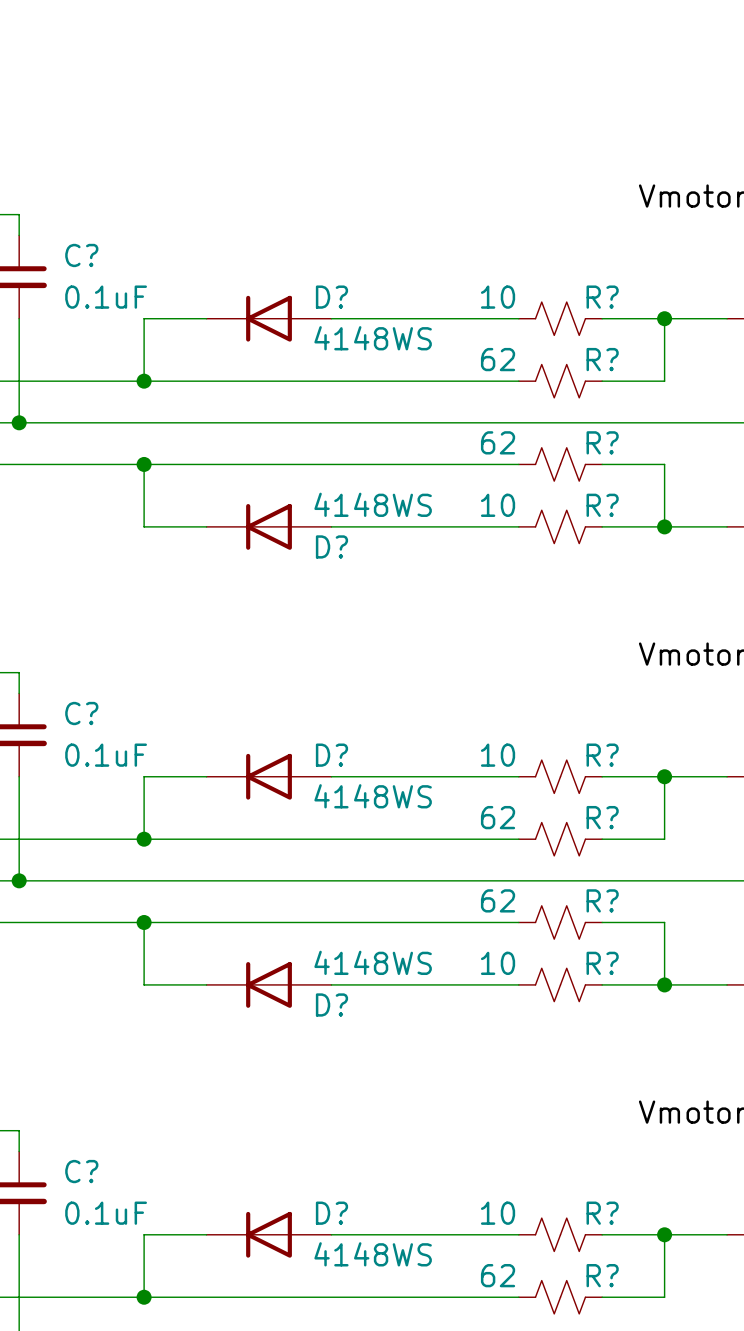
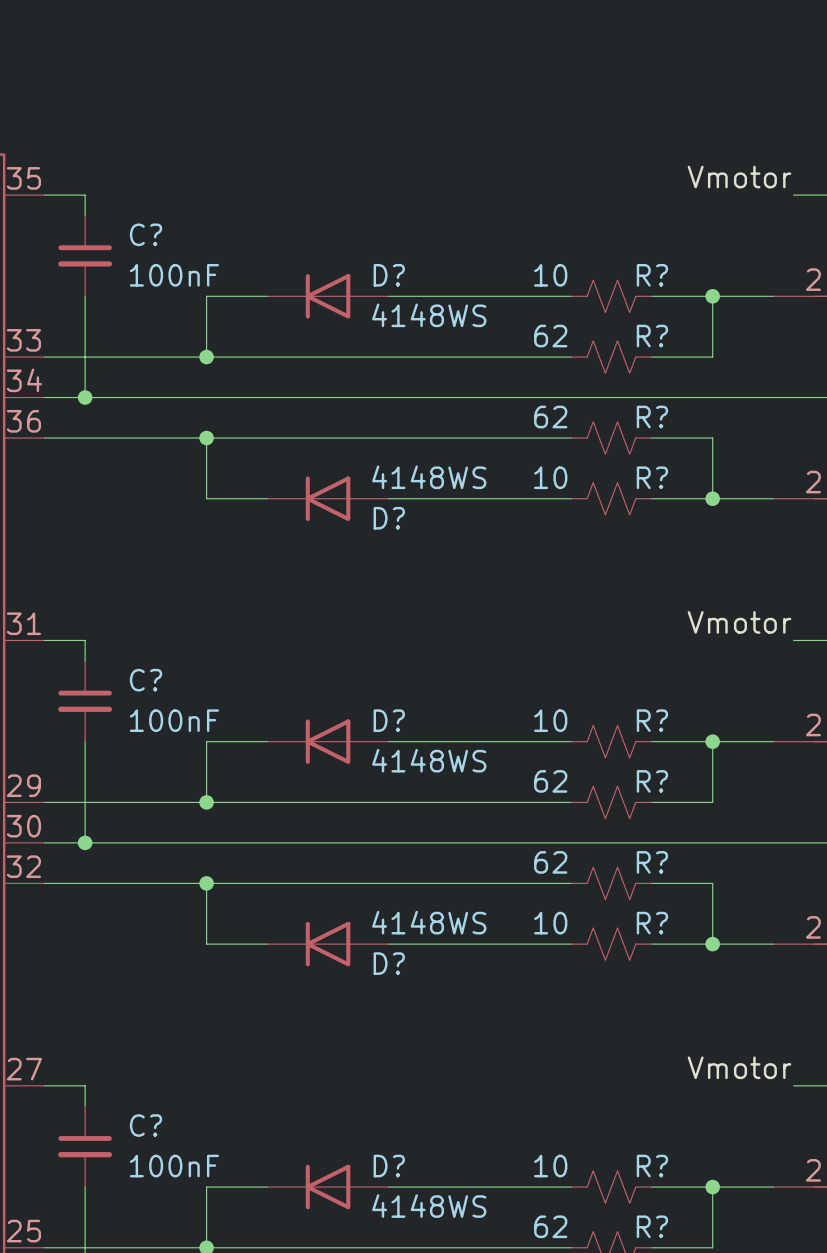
C? value: 0.1uF (106, 297) -> 100nF (174, 275)
C? value: 0.1uF (106, 755) -> 100nF (174, 720)
C? value: 0.1uF (106, 1213) -> 100nF (174, 1166)

